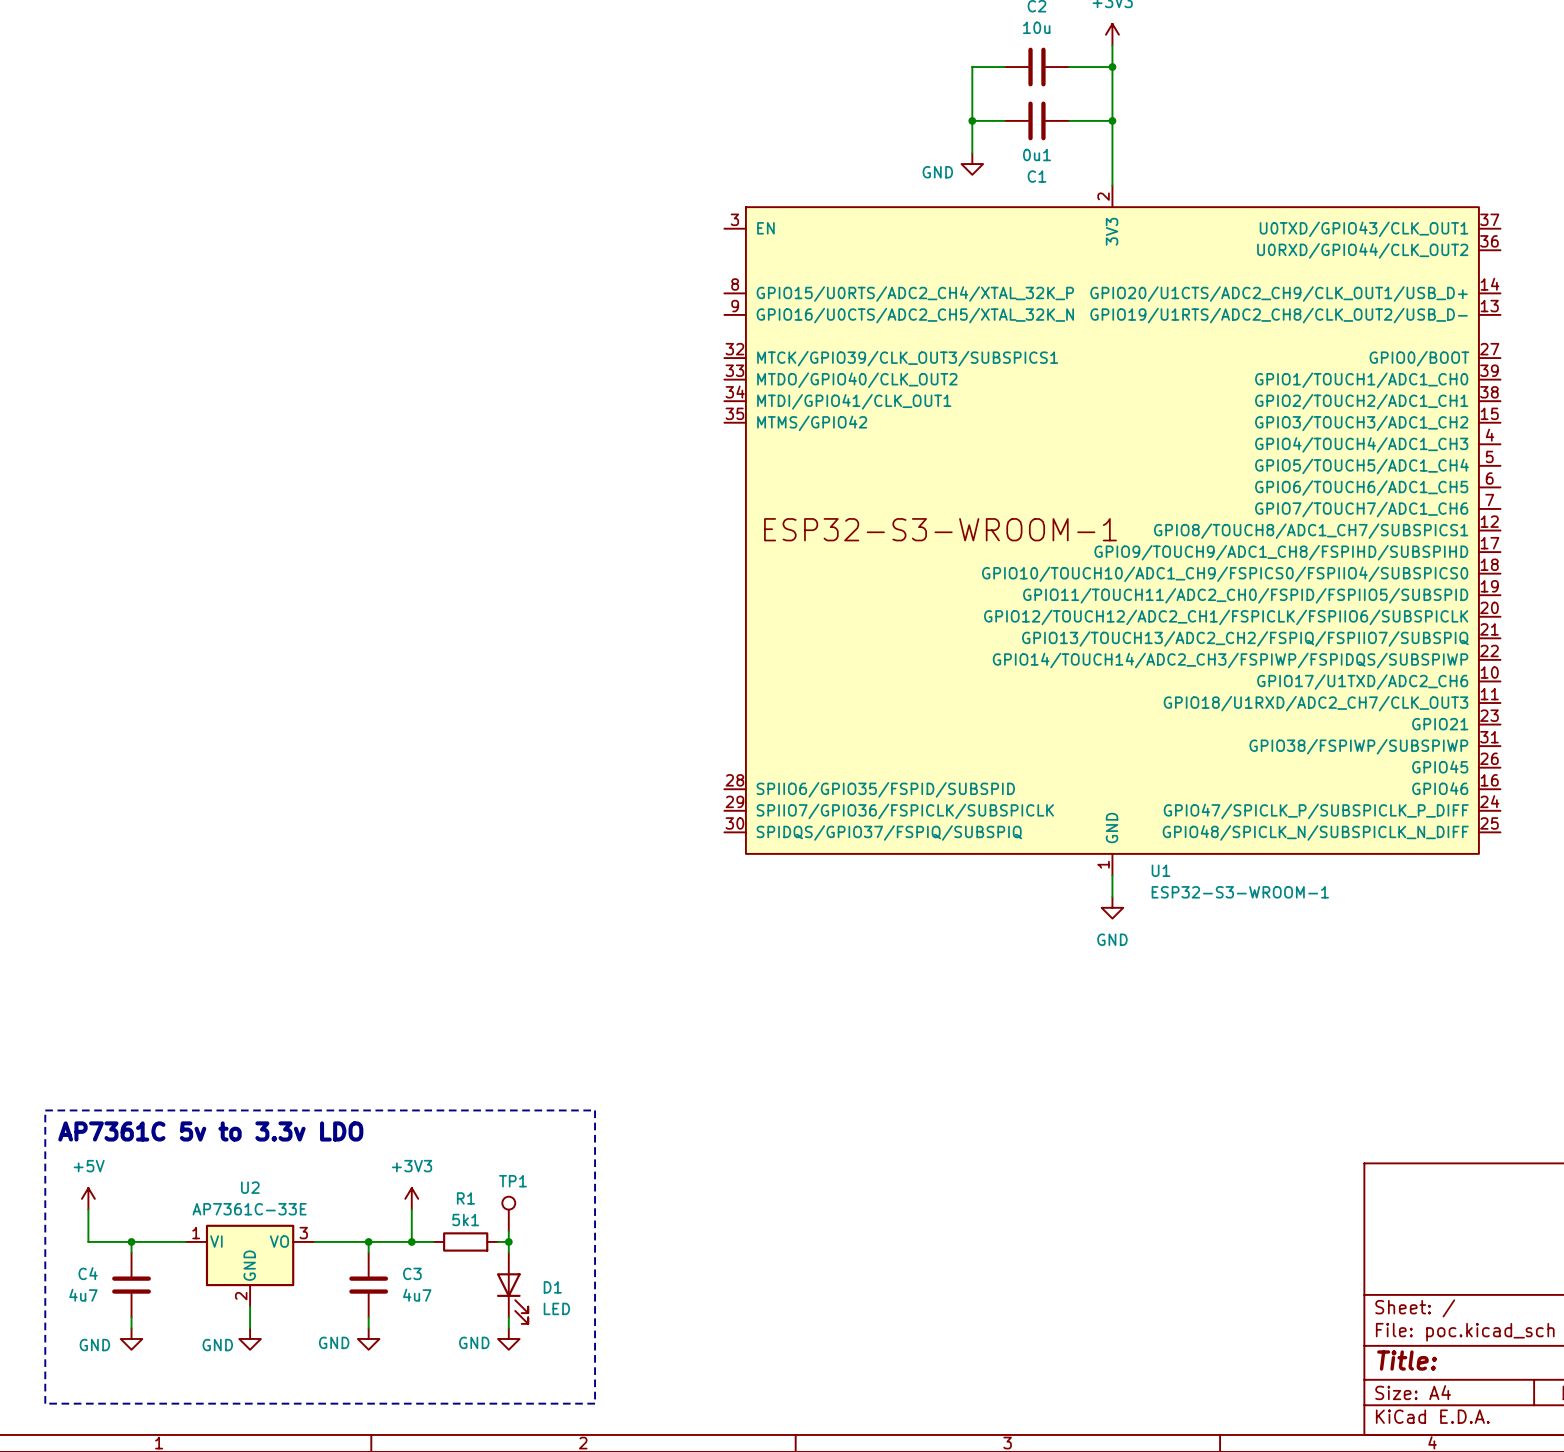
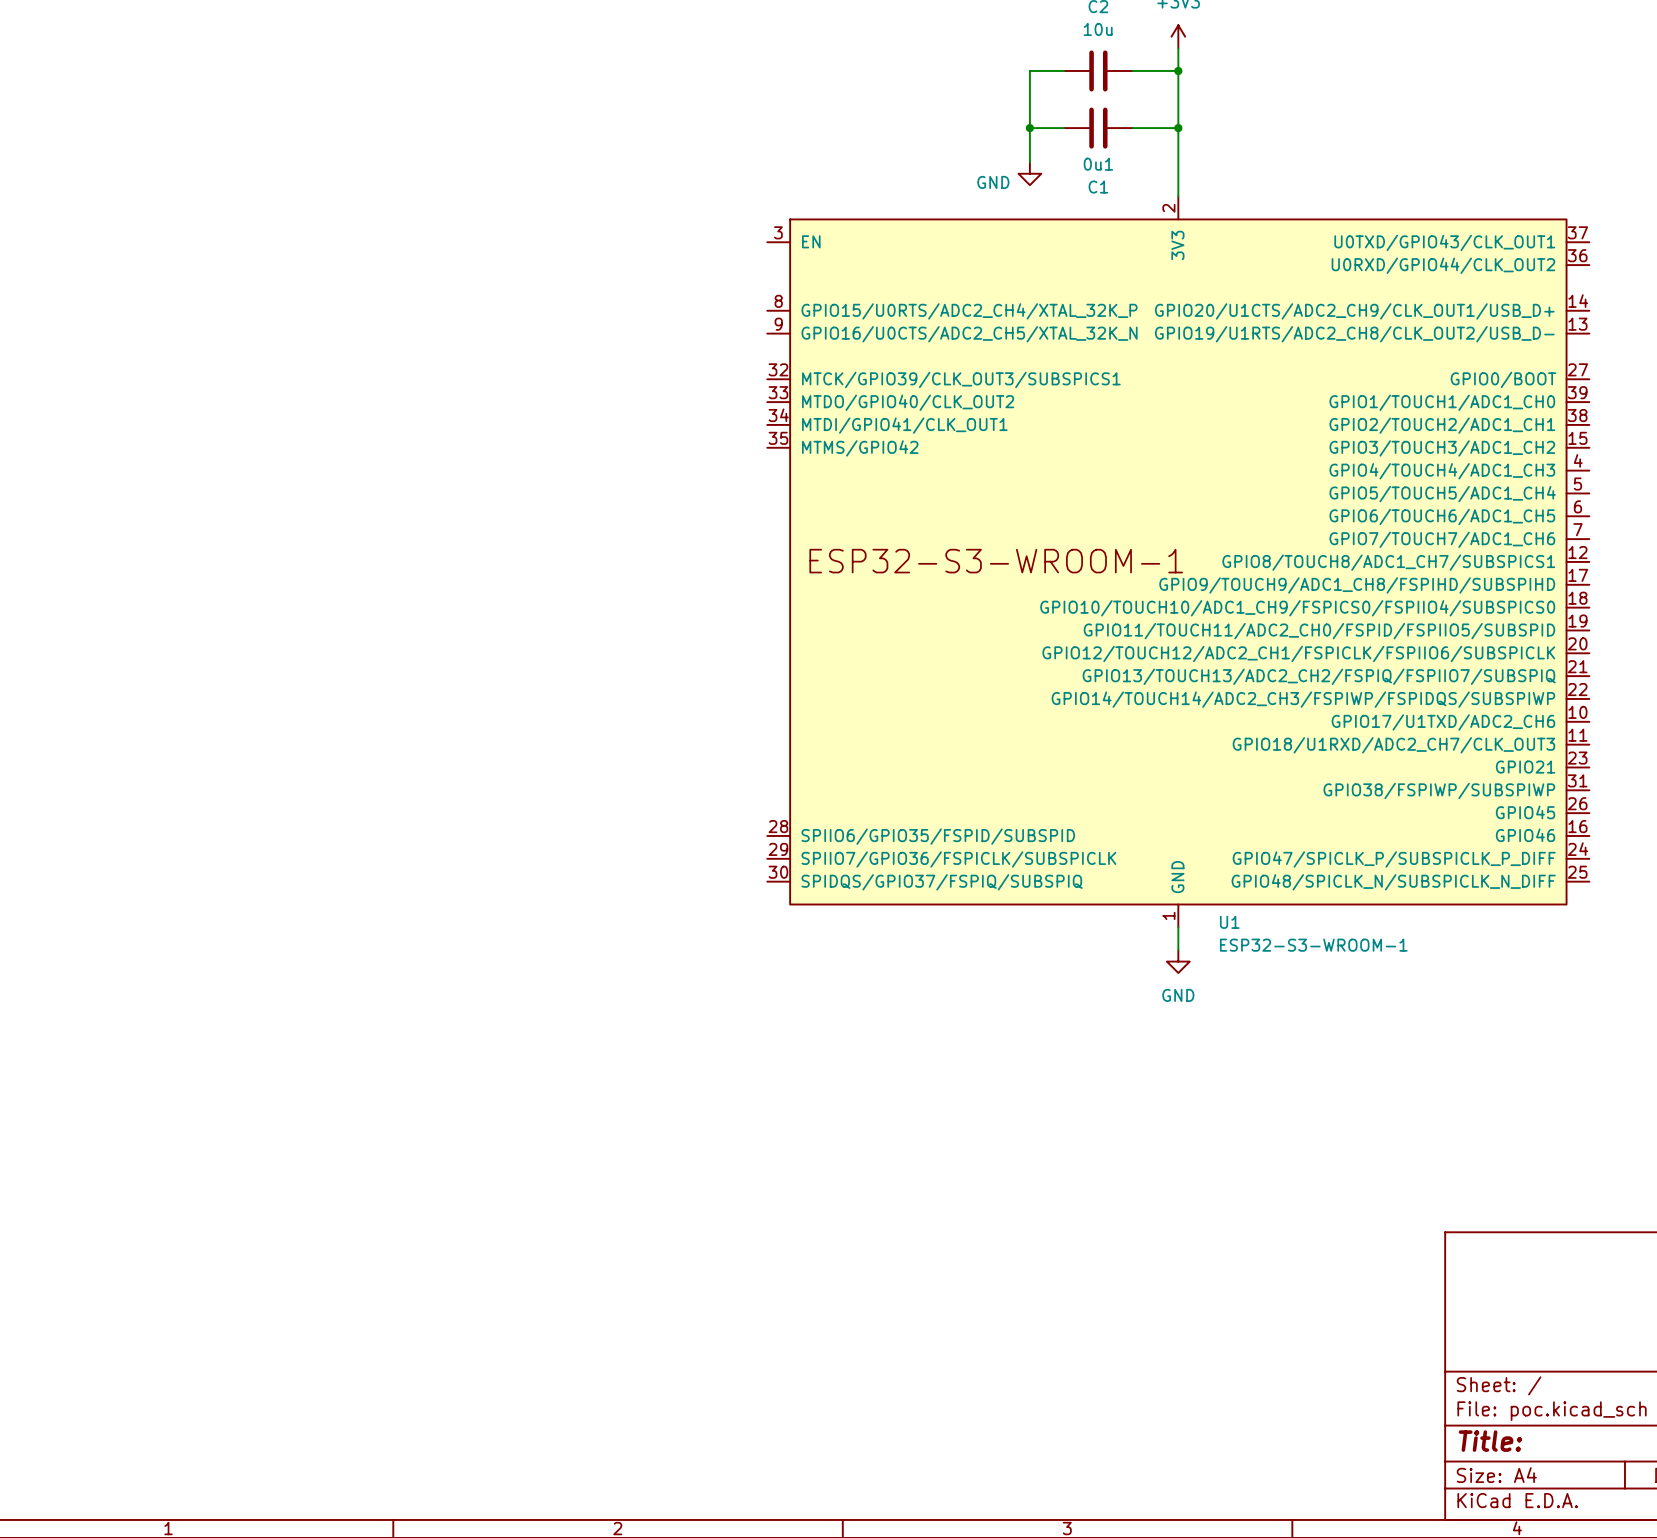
line: (45, 1110) (595, 1110) (595, 1403) (45, 1403) (45, 1110) -> none
text: AP7361C 5v to 3.3v LDO (210, 1131) -> none
power symbol: +5V (88, 1198) -> none
power symbol: +3V3 (411, 1198) -> none
wire: (88, 1209) (88, 1241) (185, 1241) -> none
wire: (411, 1209) (411, 1241) -> none
TP1: (508, 1213) -> none
wire: (508, 1231) (508, 1252) -> none
wire: (131, 1241) (131, 1252) -> none
junction: (131, 1241) -> none
wire: (314, 1241) (433, 1241) -> none
wire: (368, 1241) (368, 1252) -> none
junction: (368, 1241) -> none
junction: (411, 1241) -> none
R1: 5k1 (465, 1241) -> none
wire: (498, 1241) (508, 1241) -> none
junction: (508, 1241) -> none
U2: AP7361C-33E (250, 1265) -> none
C4: 4u7 (131, 1285) -> none
C3: 4u7 (368, 1285) -> none
D1: LED (512, 1288) -> none
wire: (250, 1306) (250, 1328) -> none
wire: (131, 1317) (131, 1328) -> none
wire: (368, 1317) (368, 1328) -> none
wire: (508, 1317) (508, 1328) -> none
power symbol: GND (131, 1338) -> none
power symbol: GND (250, 1338) -> none
power symbol: GND (368, 1338) -> none
power symbol: GND (508, 1338) -> none

